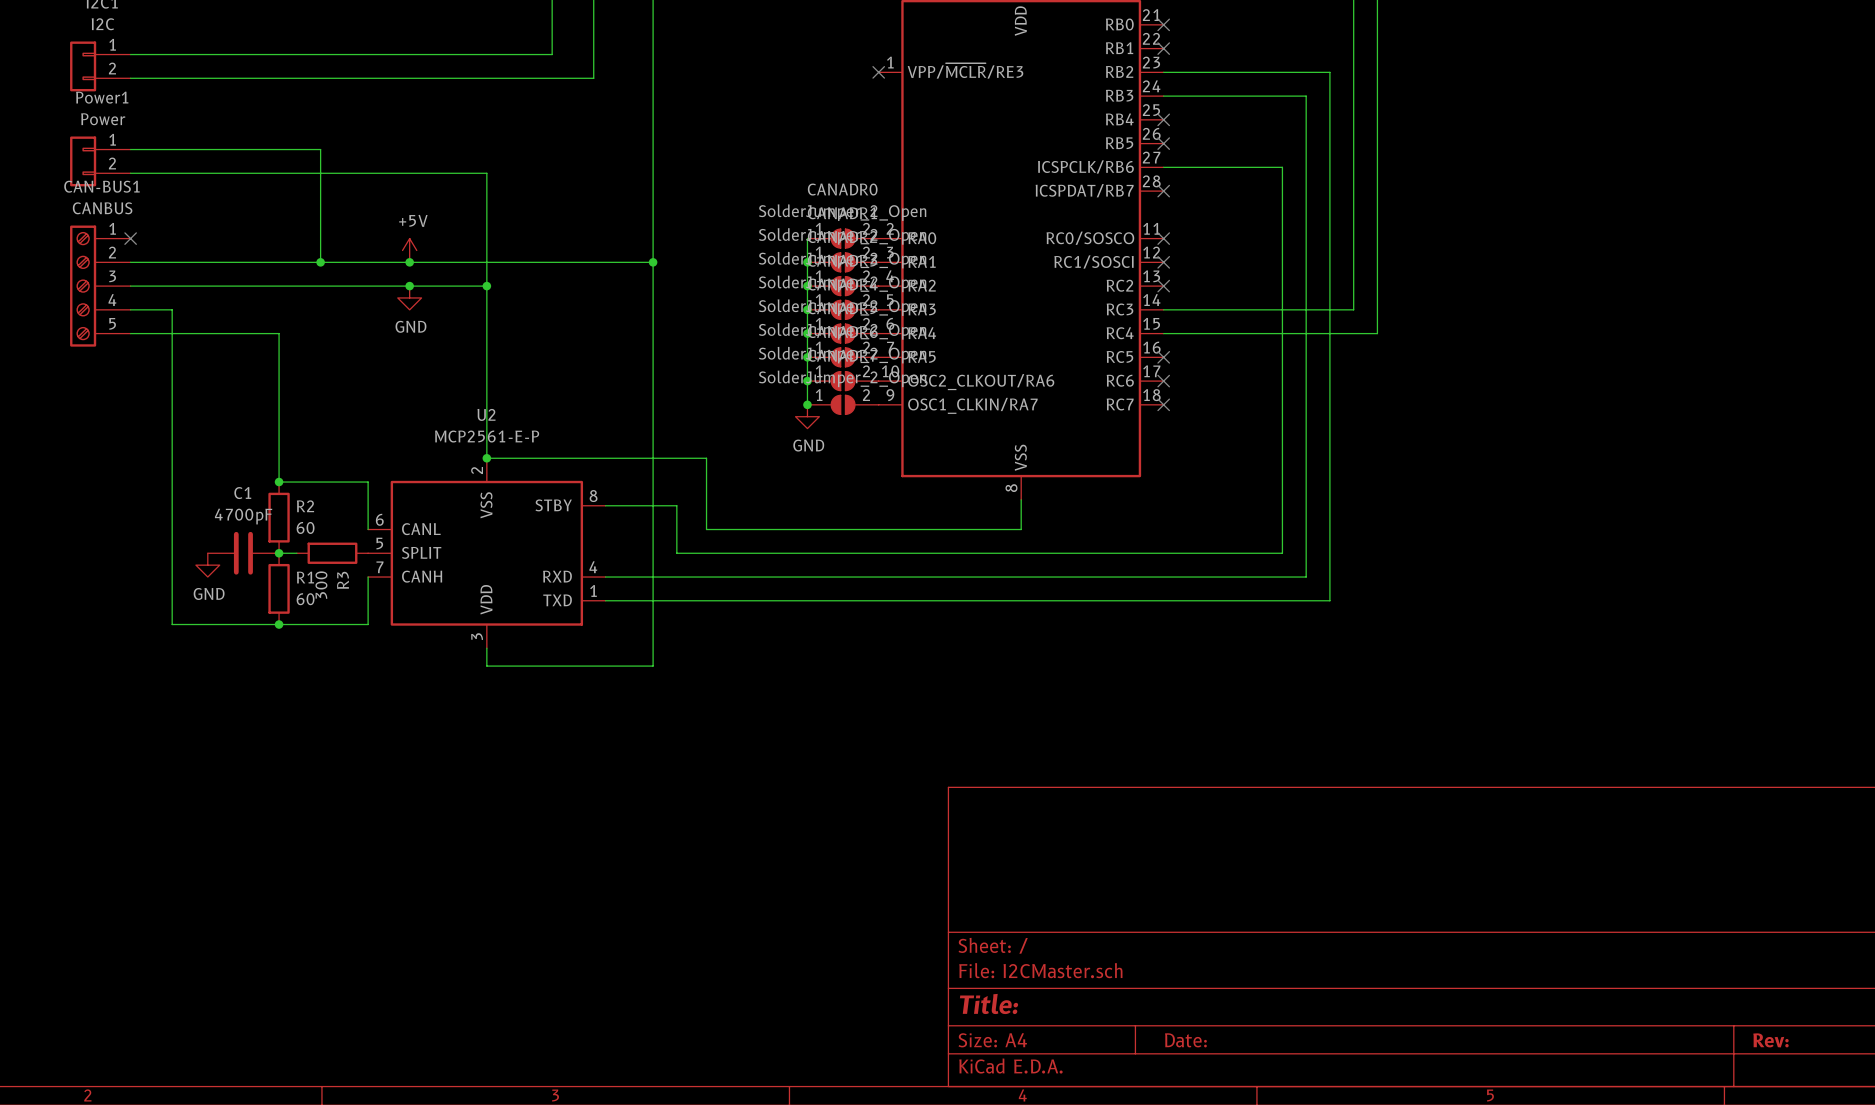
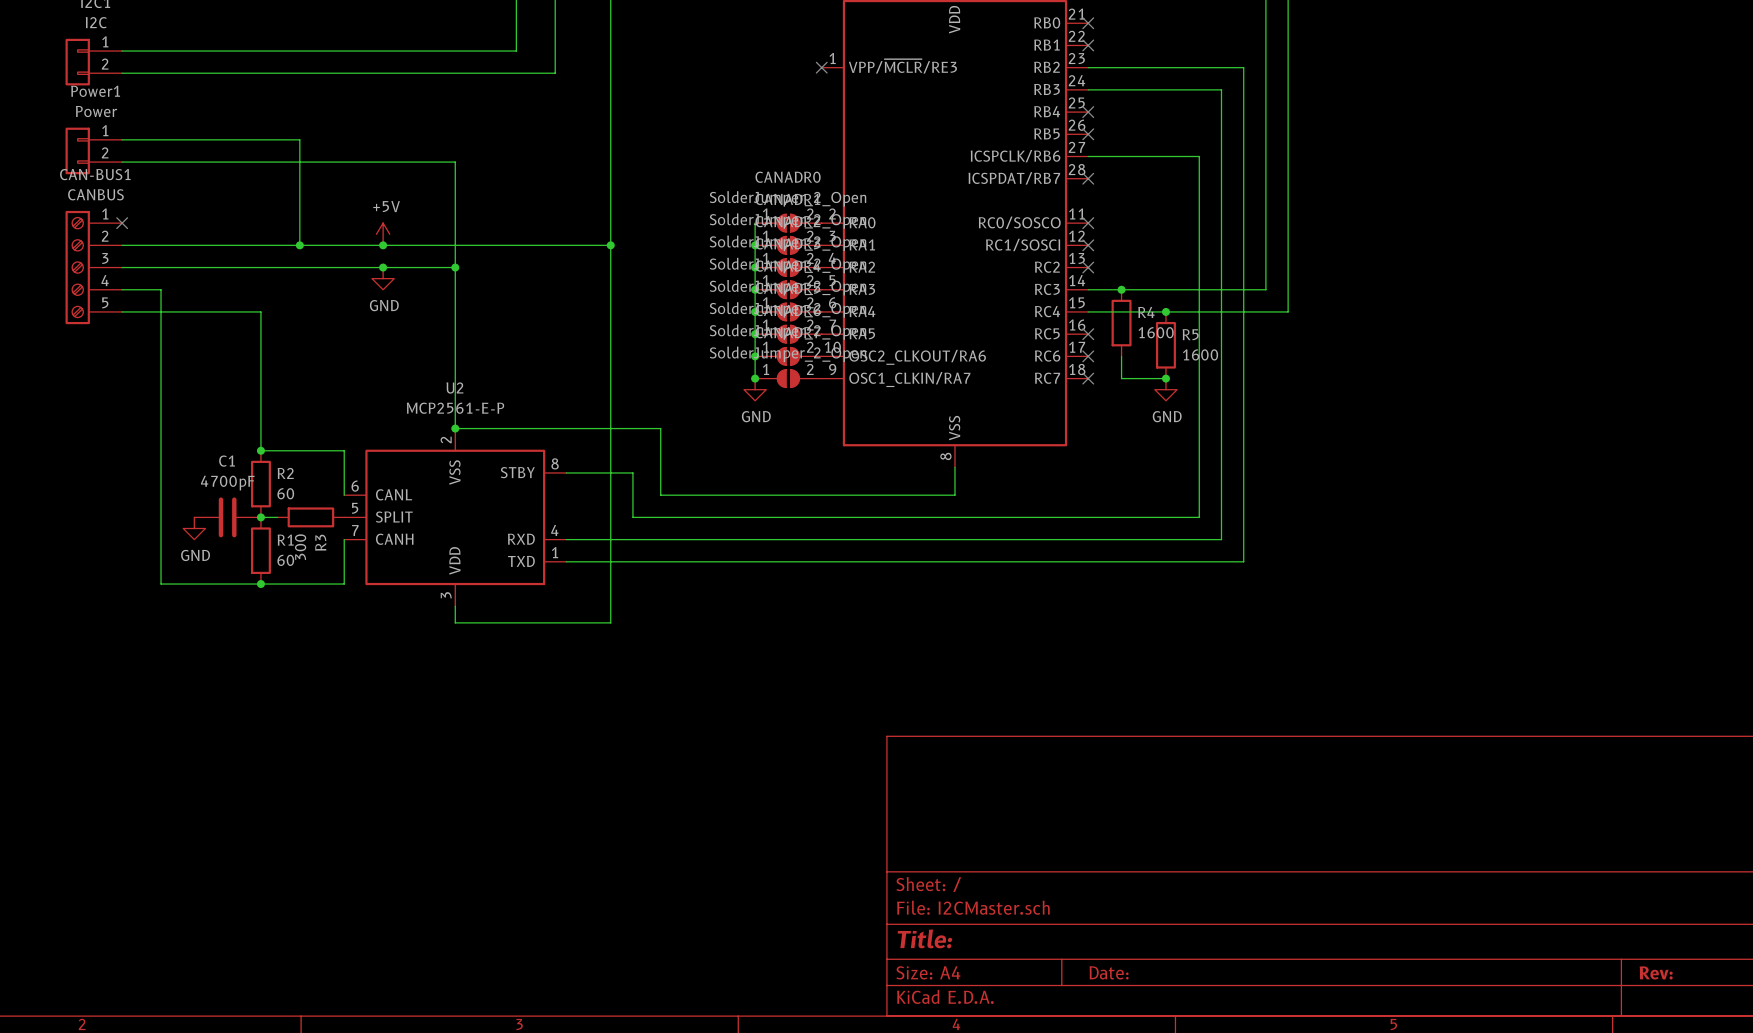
junction: none -> (1121, 289)
junction: none -> (1165, 311)
R4: none -> 1600 (1121, 323)
R5: none -> 1600 (1165, 345)
wire: none -> (1121, 356) (1121, 378) (1165, 378)
junction: none -> (1165, 378)
power symbol: none -> GND (1165, 389)

